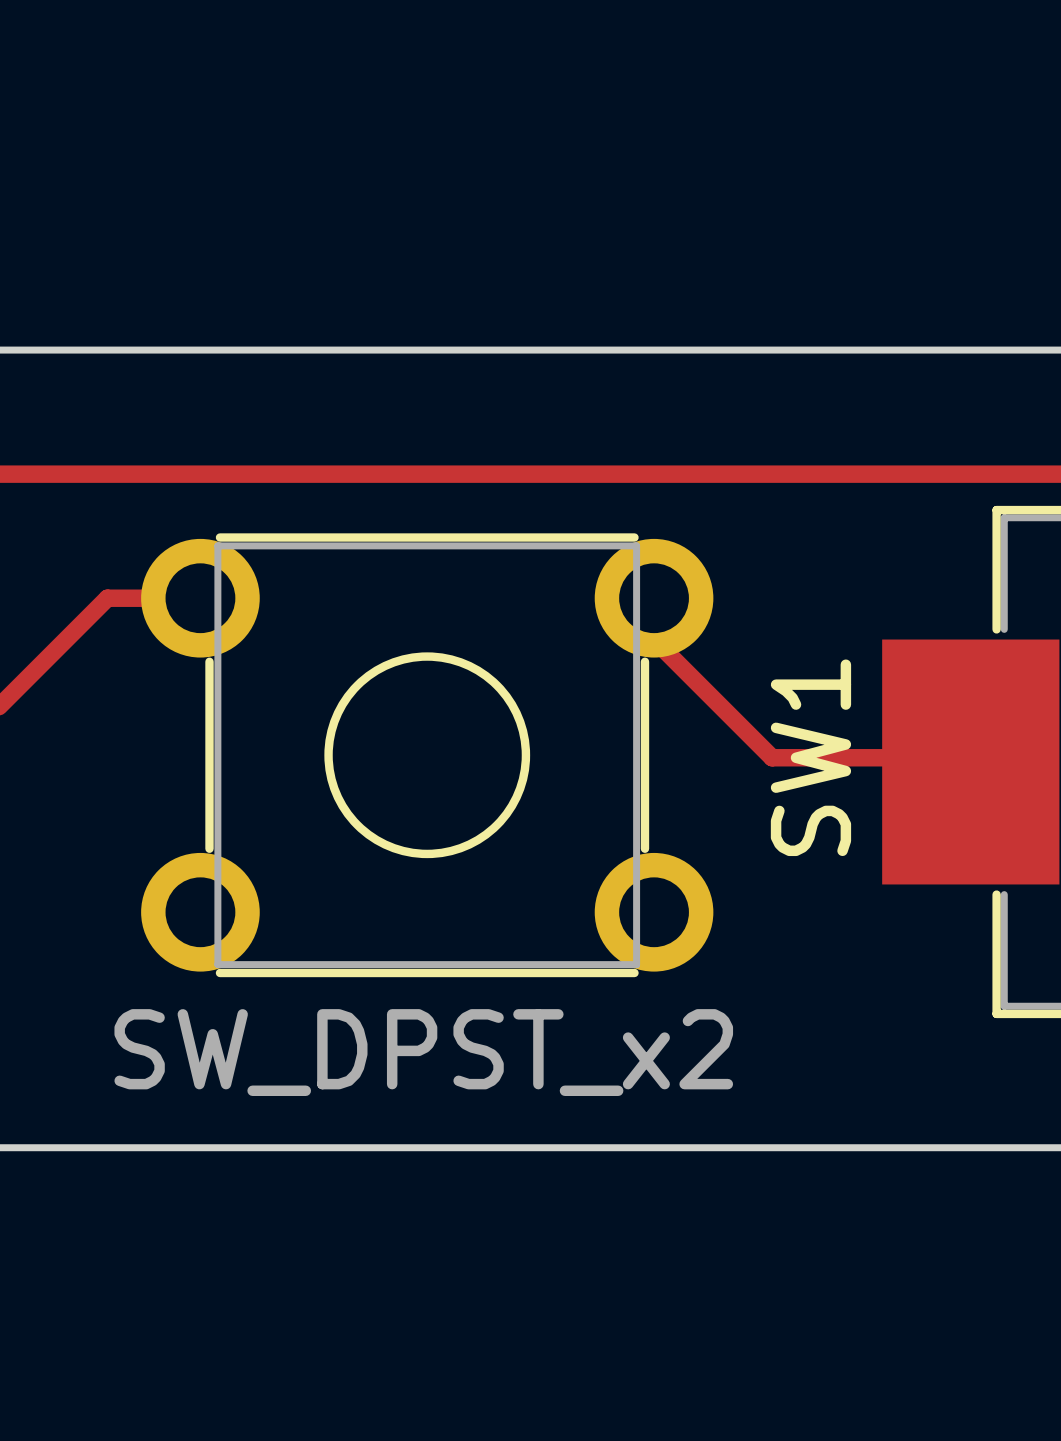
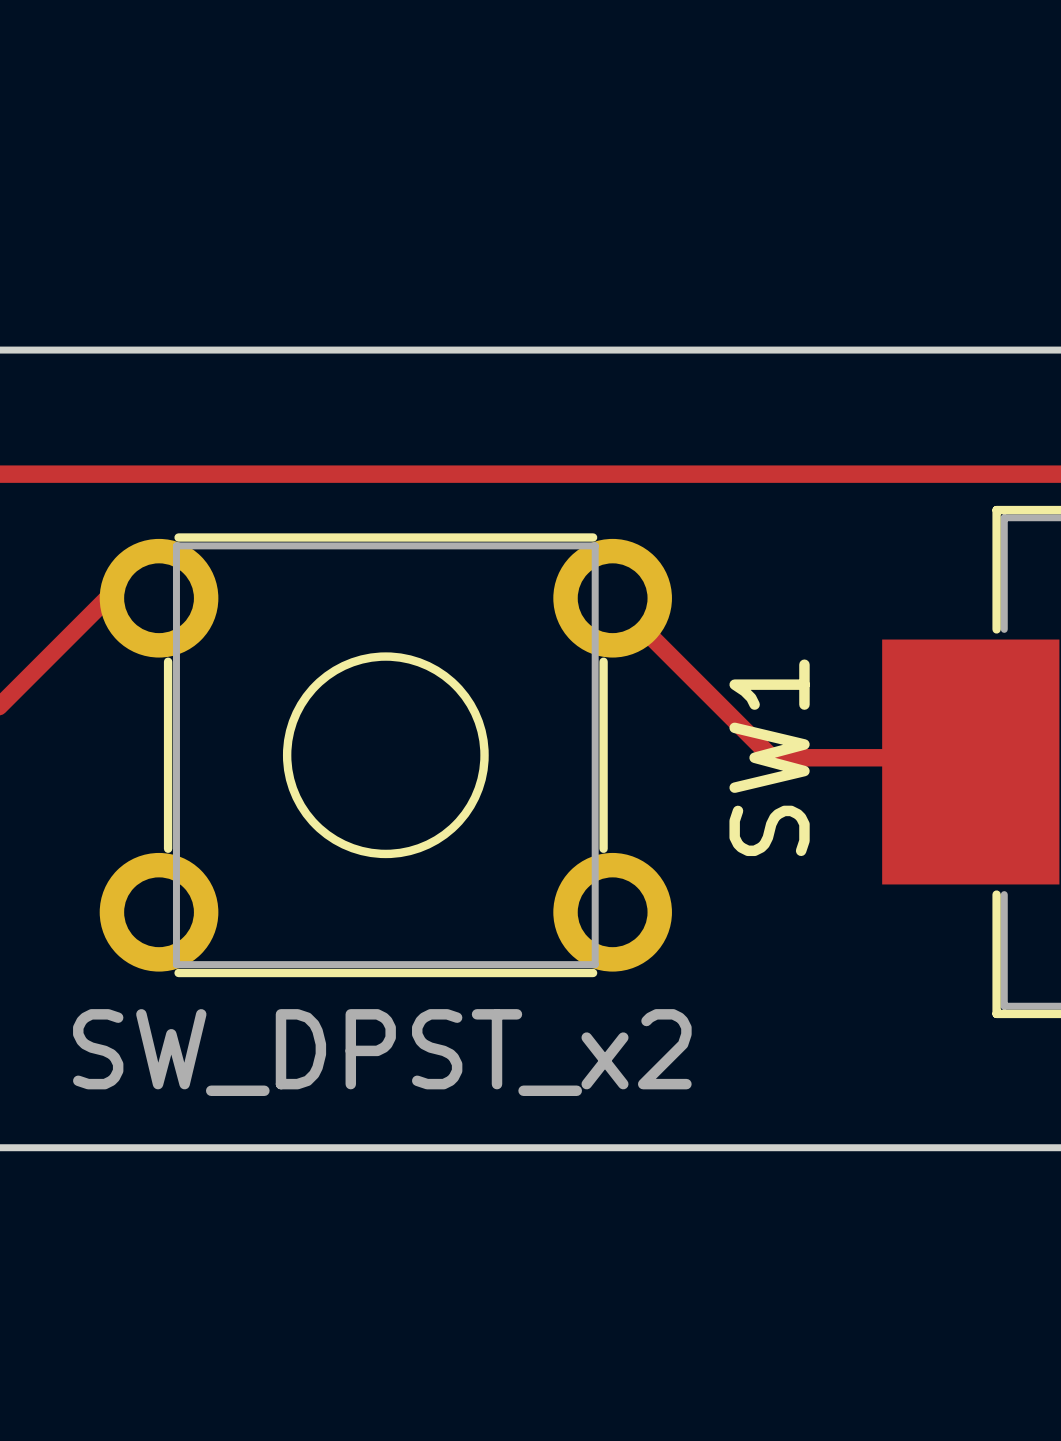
SW1 position: (427, 755) -> (385, 755)

